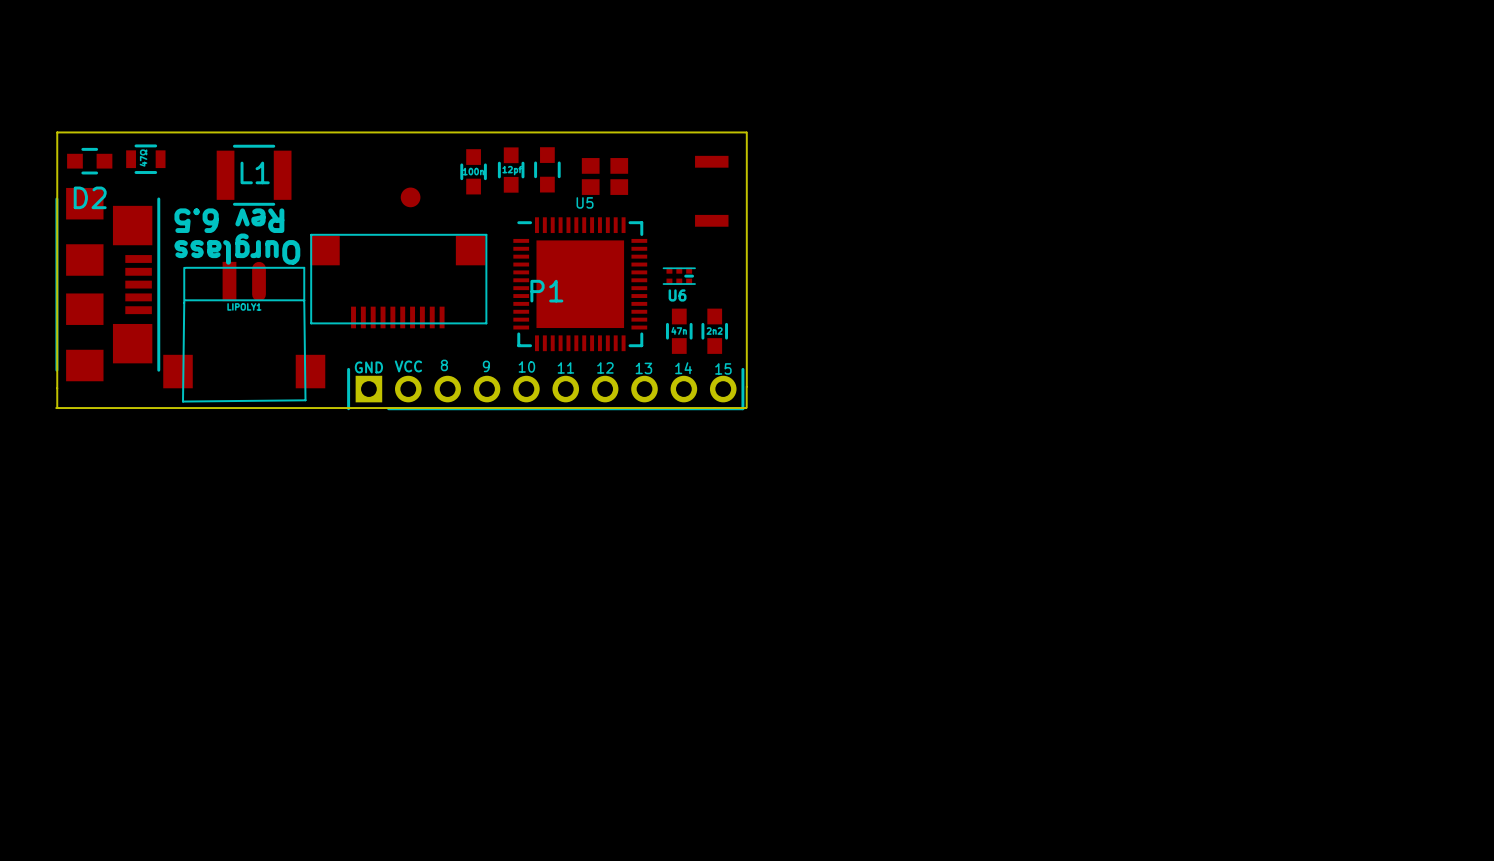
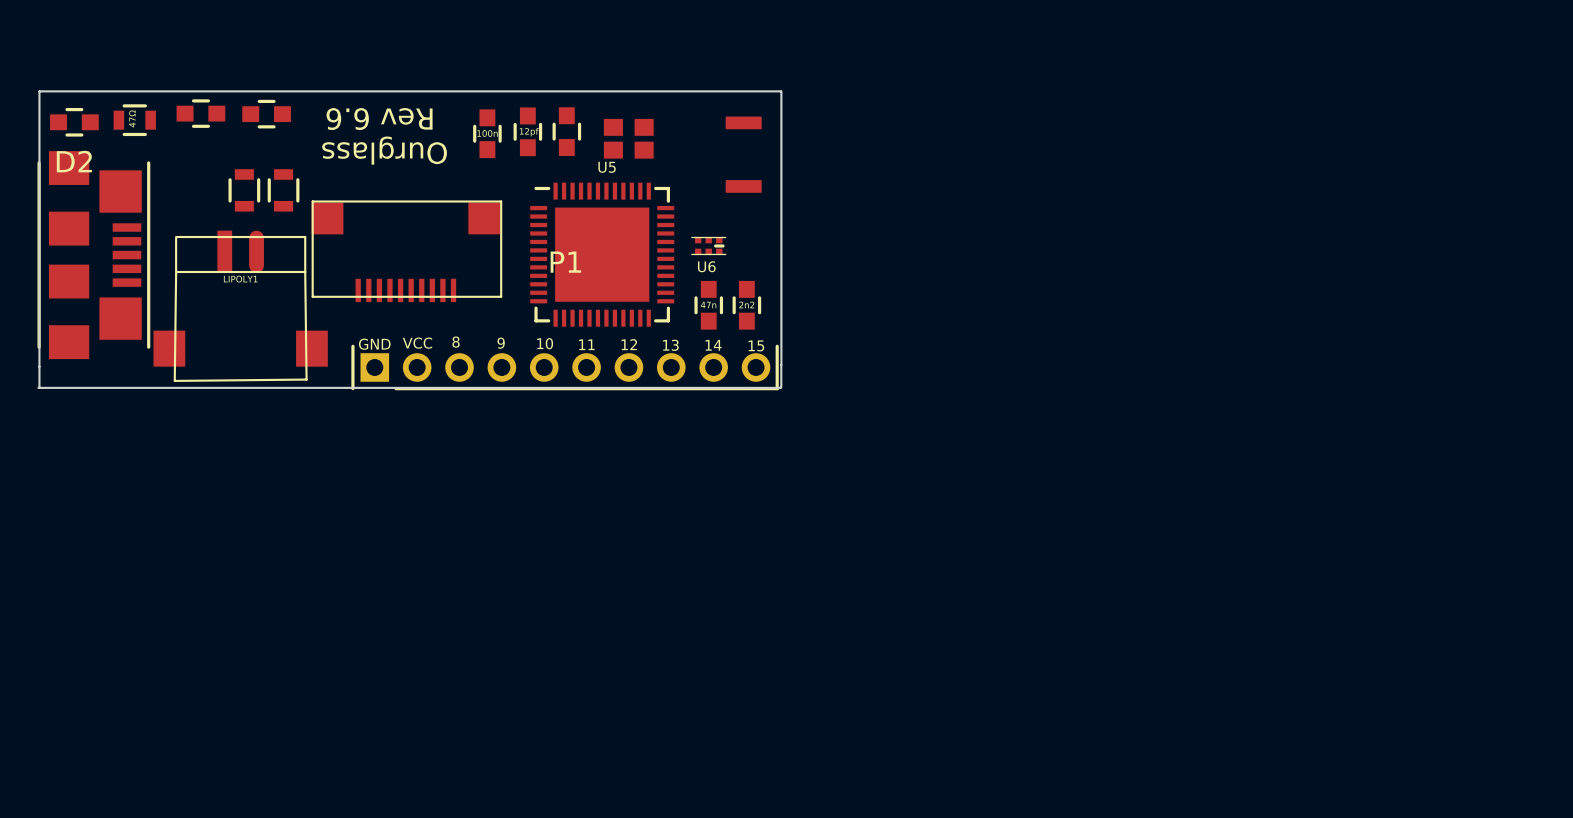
part: none -> (200, 113)
part: none -> (266, 114)
text: none -> Rev 6.6 (379, 119)
L1: (254, 175) -> none
part: (410, 197) -> none
text: Rev 6.5 (229, 220) -> none
part: none -> (244, 190)
part: none -> (283, 190)
text position: Ourglass (237, 249) -> Ourglass (384, 150)

